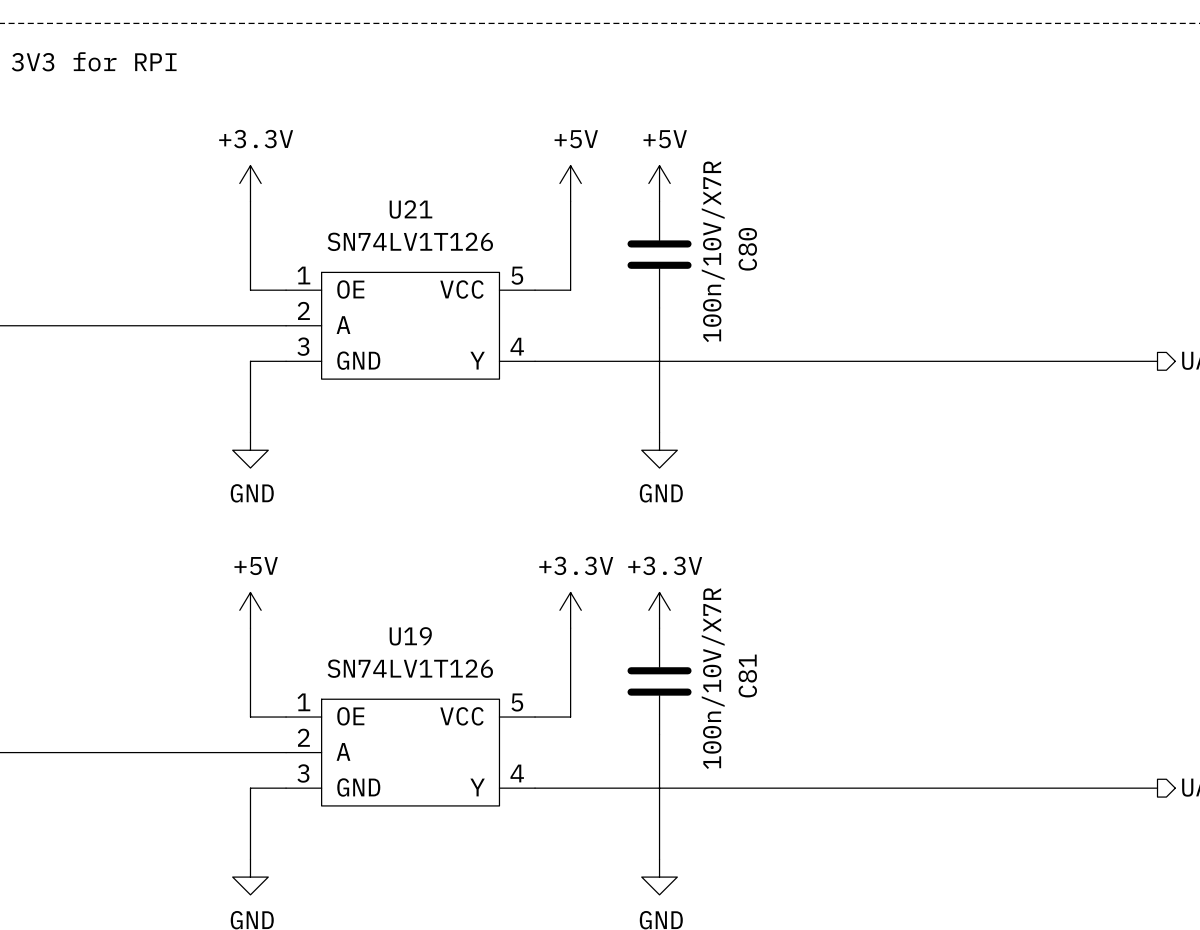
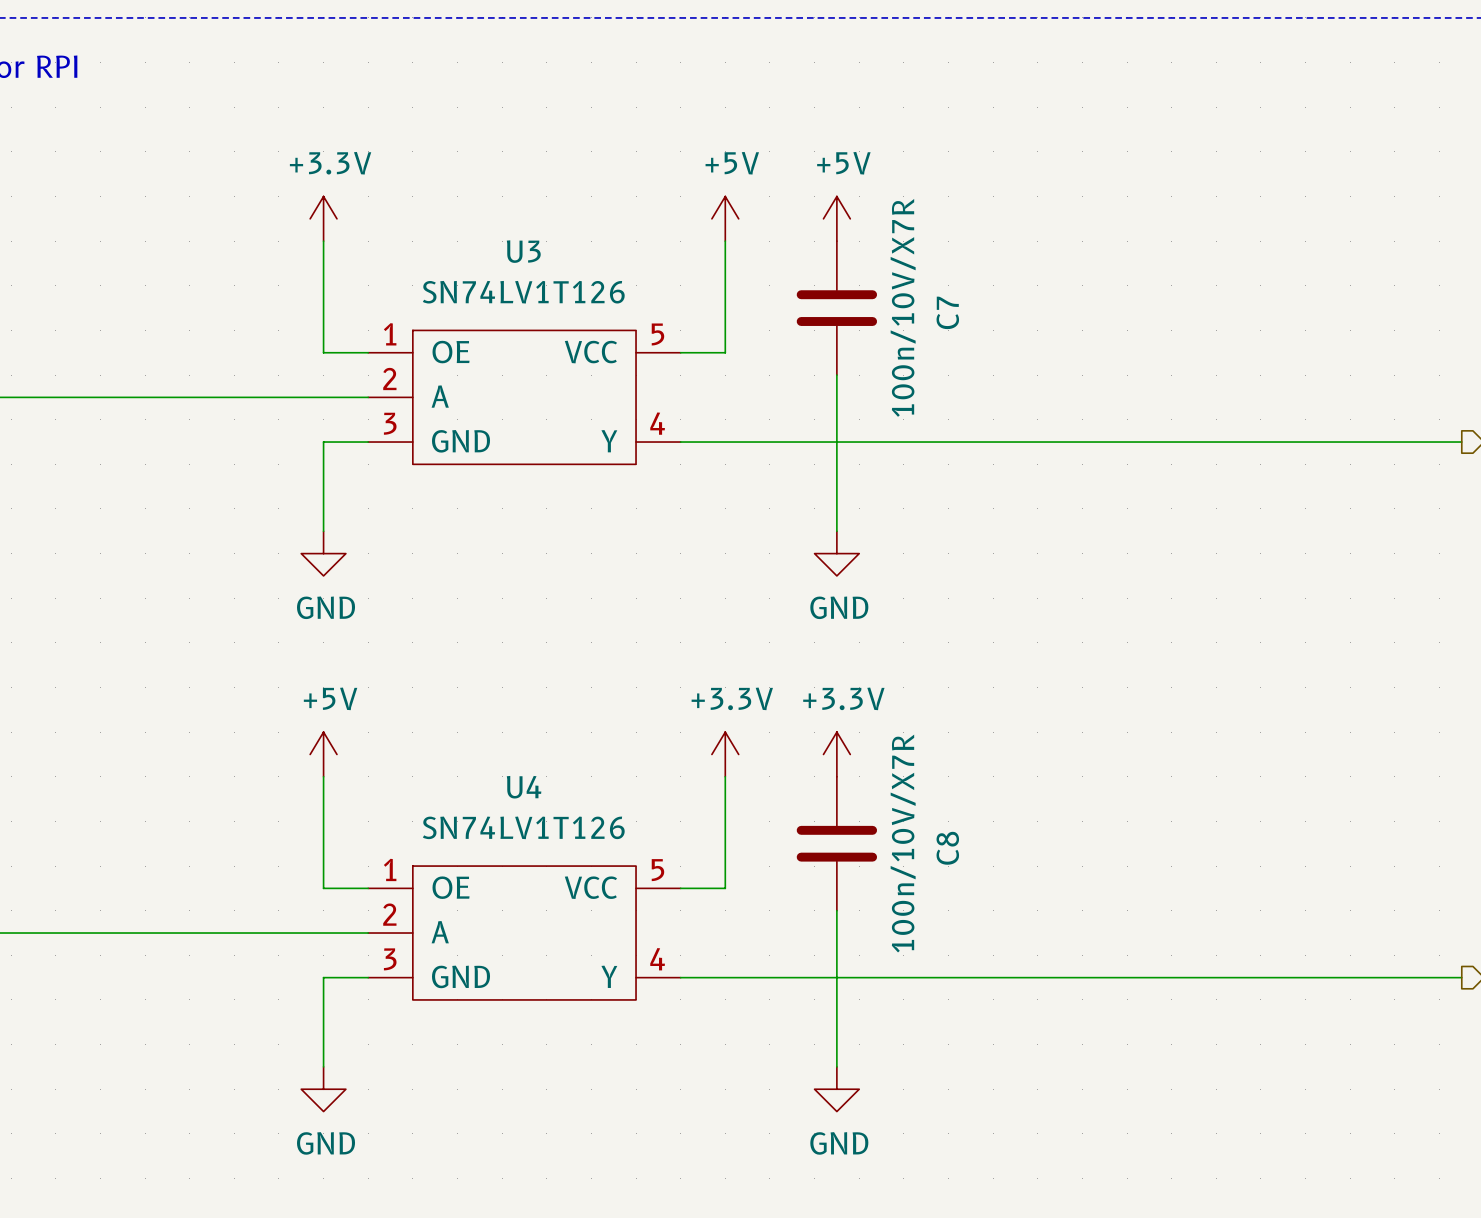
U21 name: U21 (410, 209) -> U3 (523, 251)
C80 name: C80 (747, 249) -> C7 (947, 312)
U19 name: U19 (410, 636) -> U4 (524, 787)
C81 name: C81 (747, 676) -> C8 (947, 848)

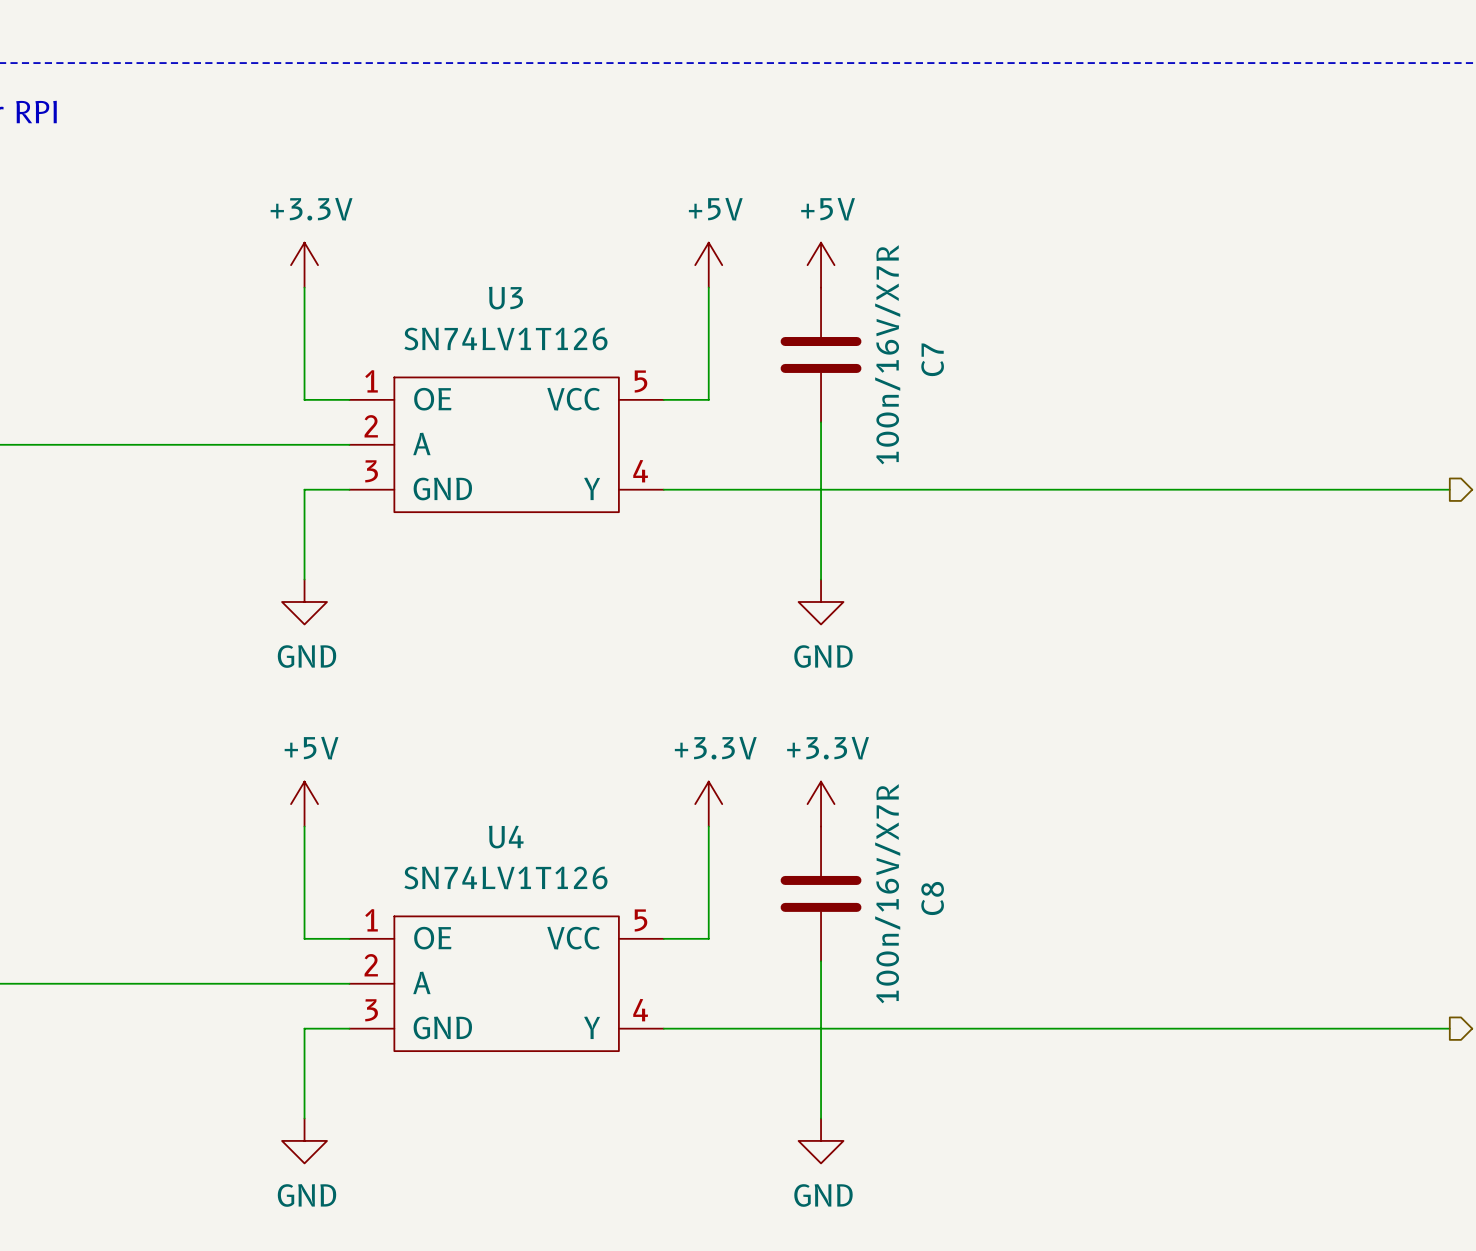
C7 value: 100n/10V/X7R (903, 307) -> 100n/16V/X7R (887, 354)
C8 value: 100n/10V/X7R (903, 843) -> 100n/16V/X7R (887, 893)

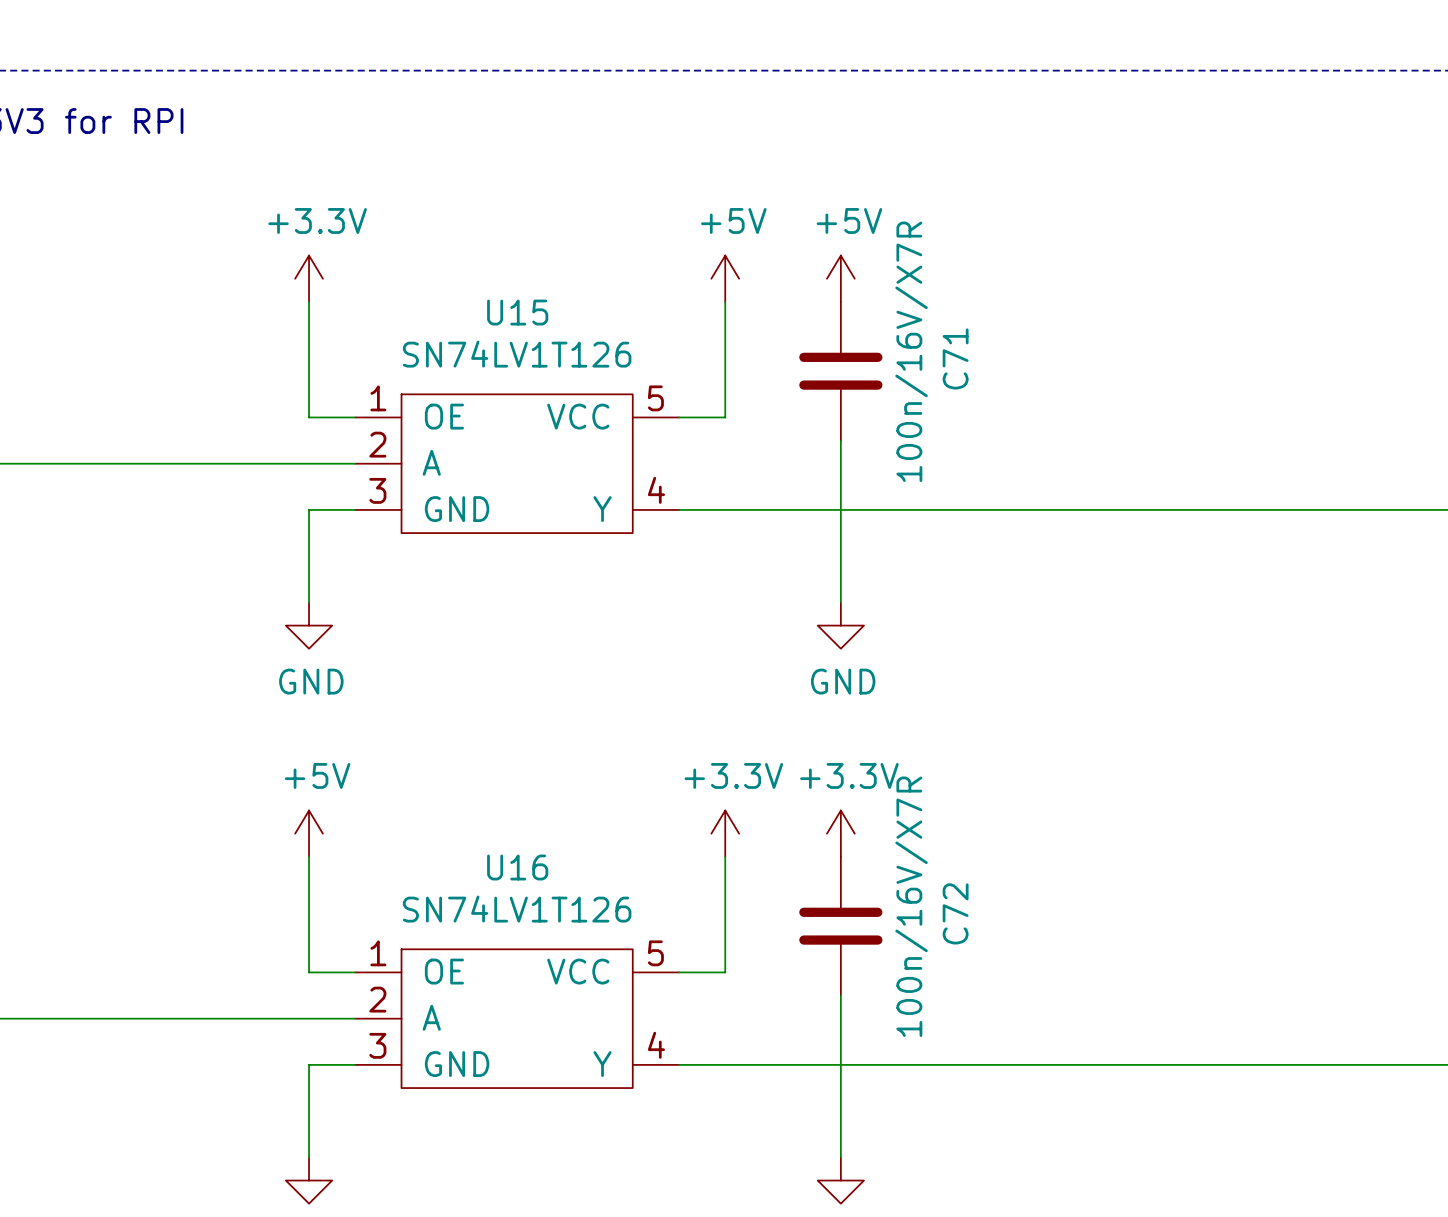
U3 name: U3 (505, 298) -> U15 (517, 312)
C7 name: C7 (932, 359) -> C71 (955, 358)
U4 name: U4 (506, 837) -> U16 (517, 867)
C8 name: C8 (932, 898) -> C72 (955, 913)

